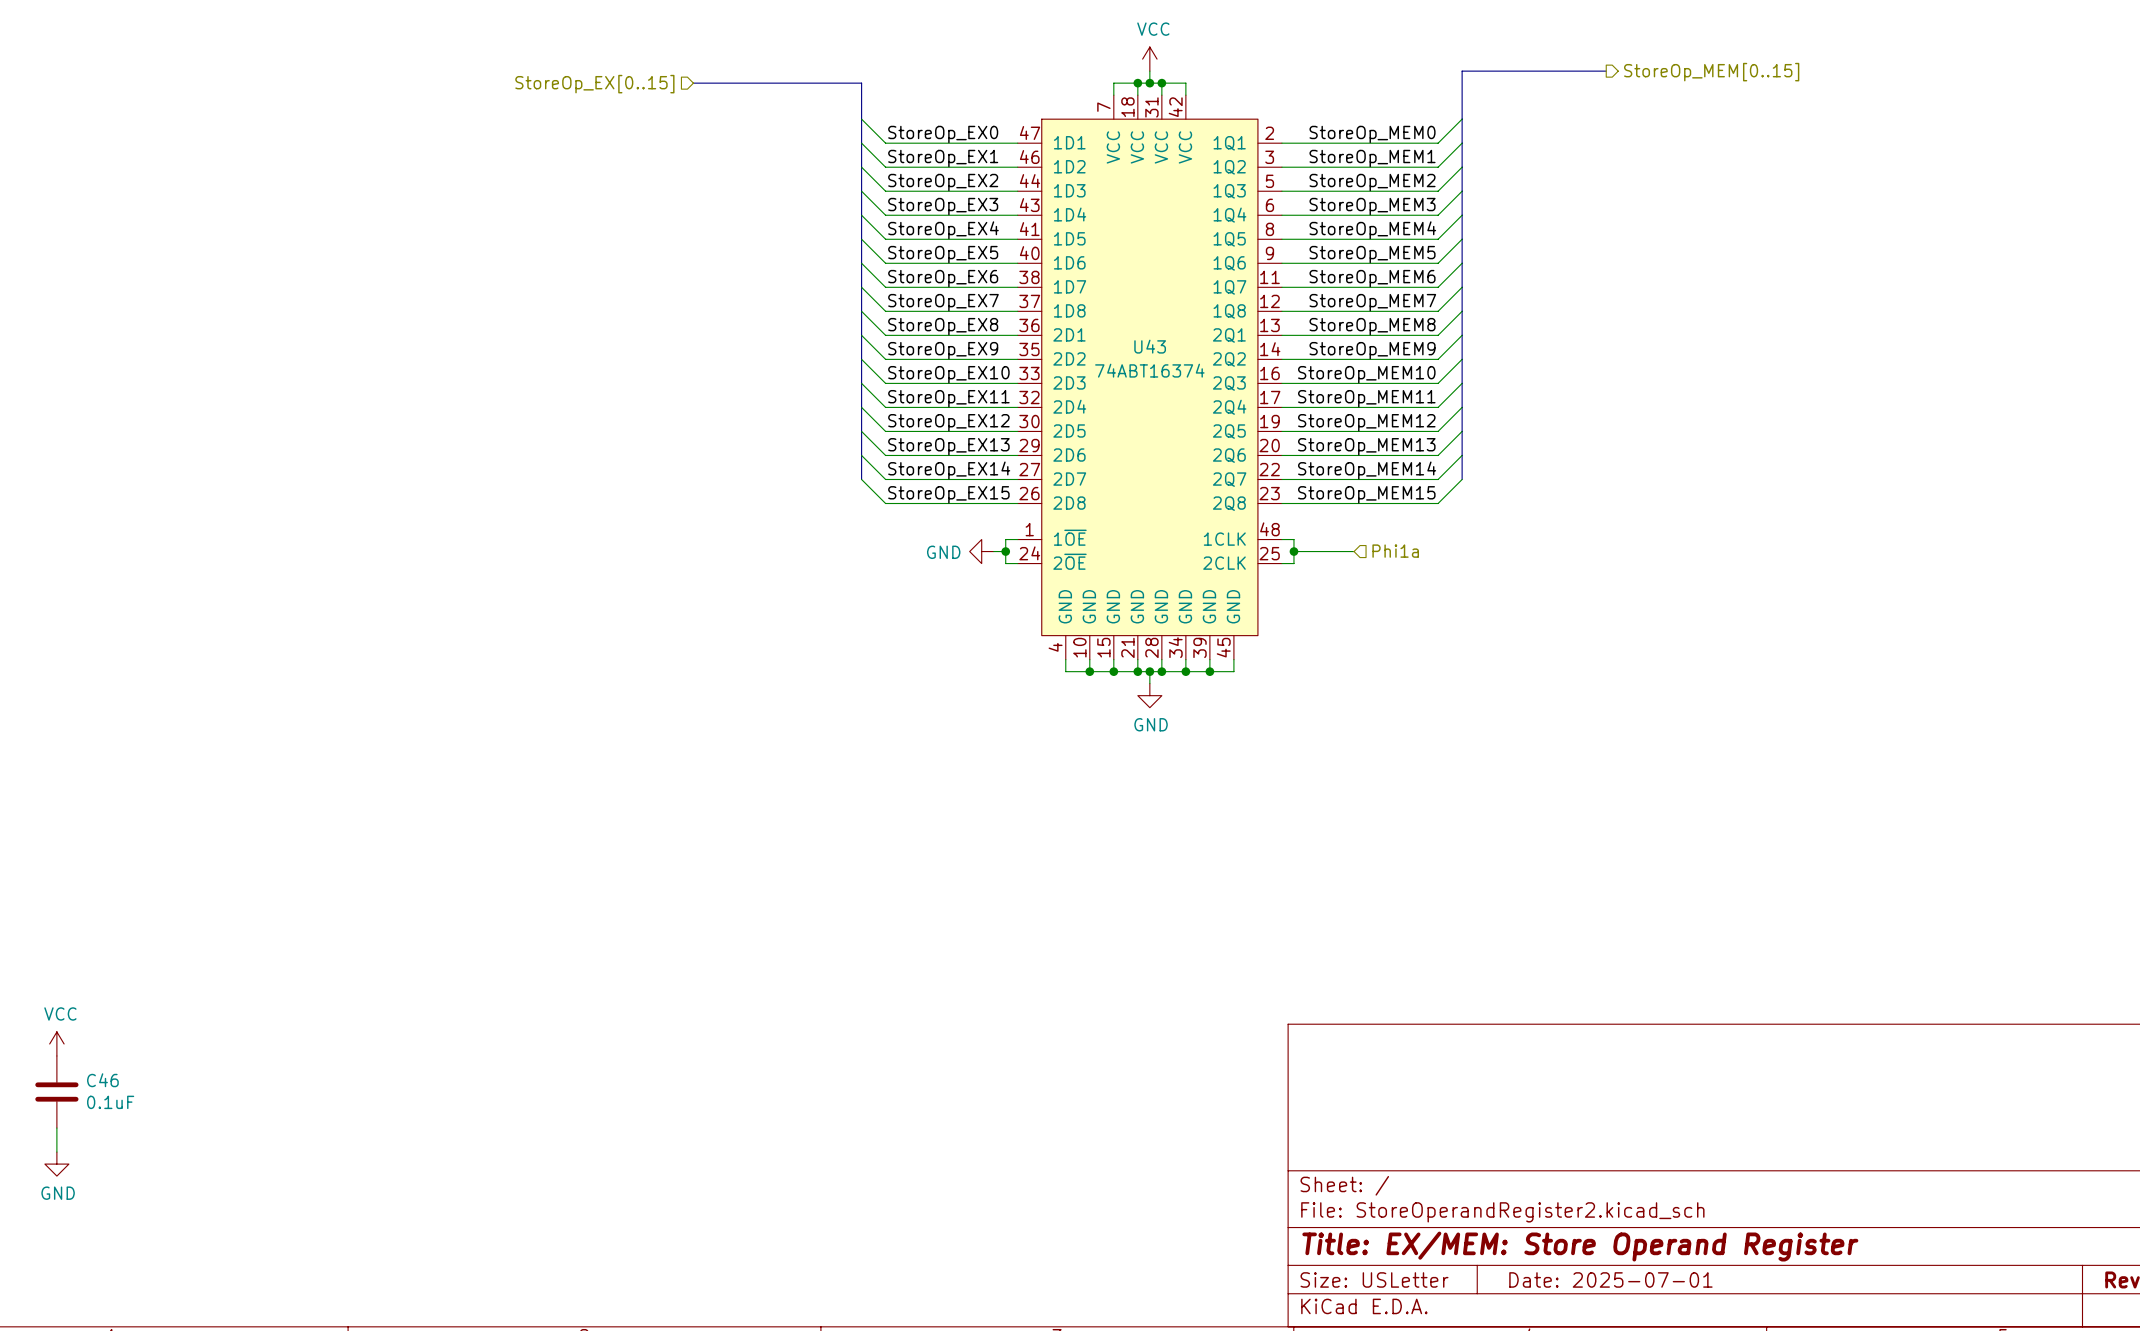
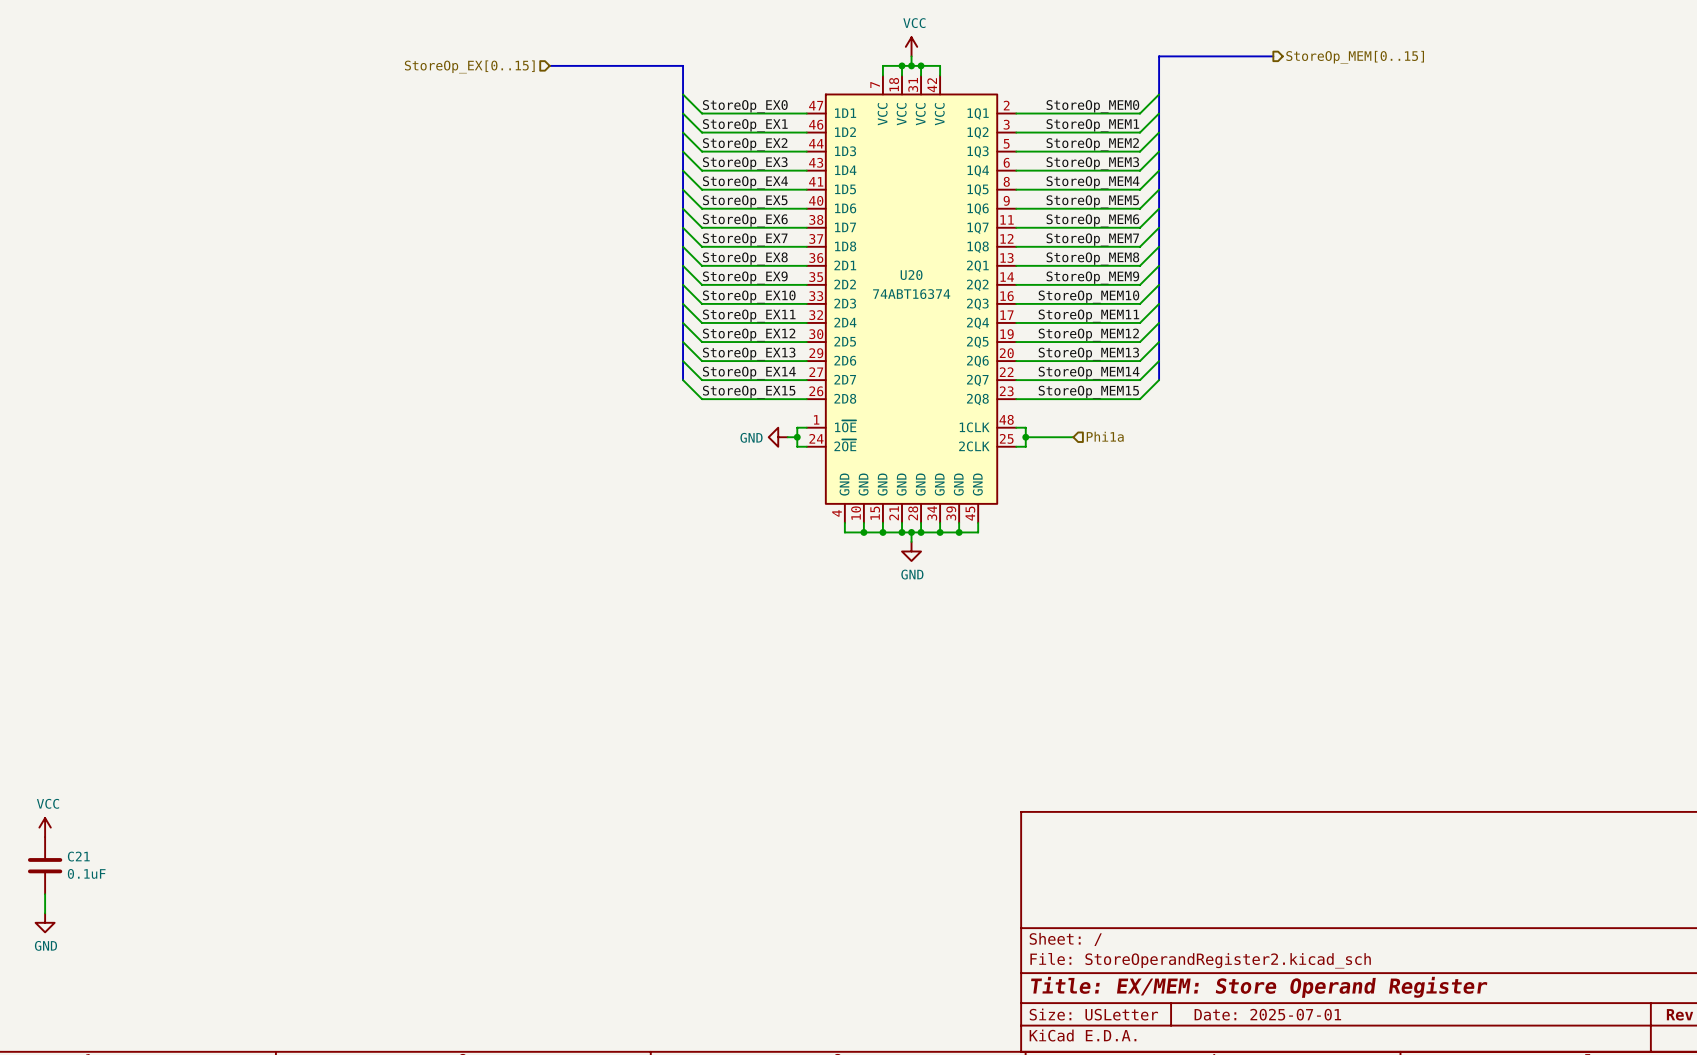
U43 name: U43 (1150, 346) -> U20 (911, 275)
C46 name: C46 (102, 1080) -> C21 (78, 856)

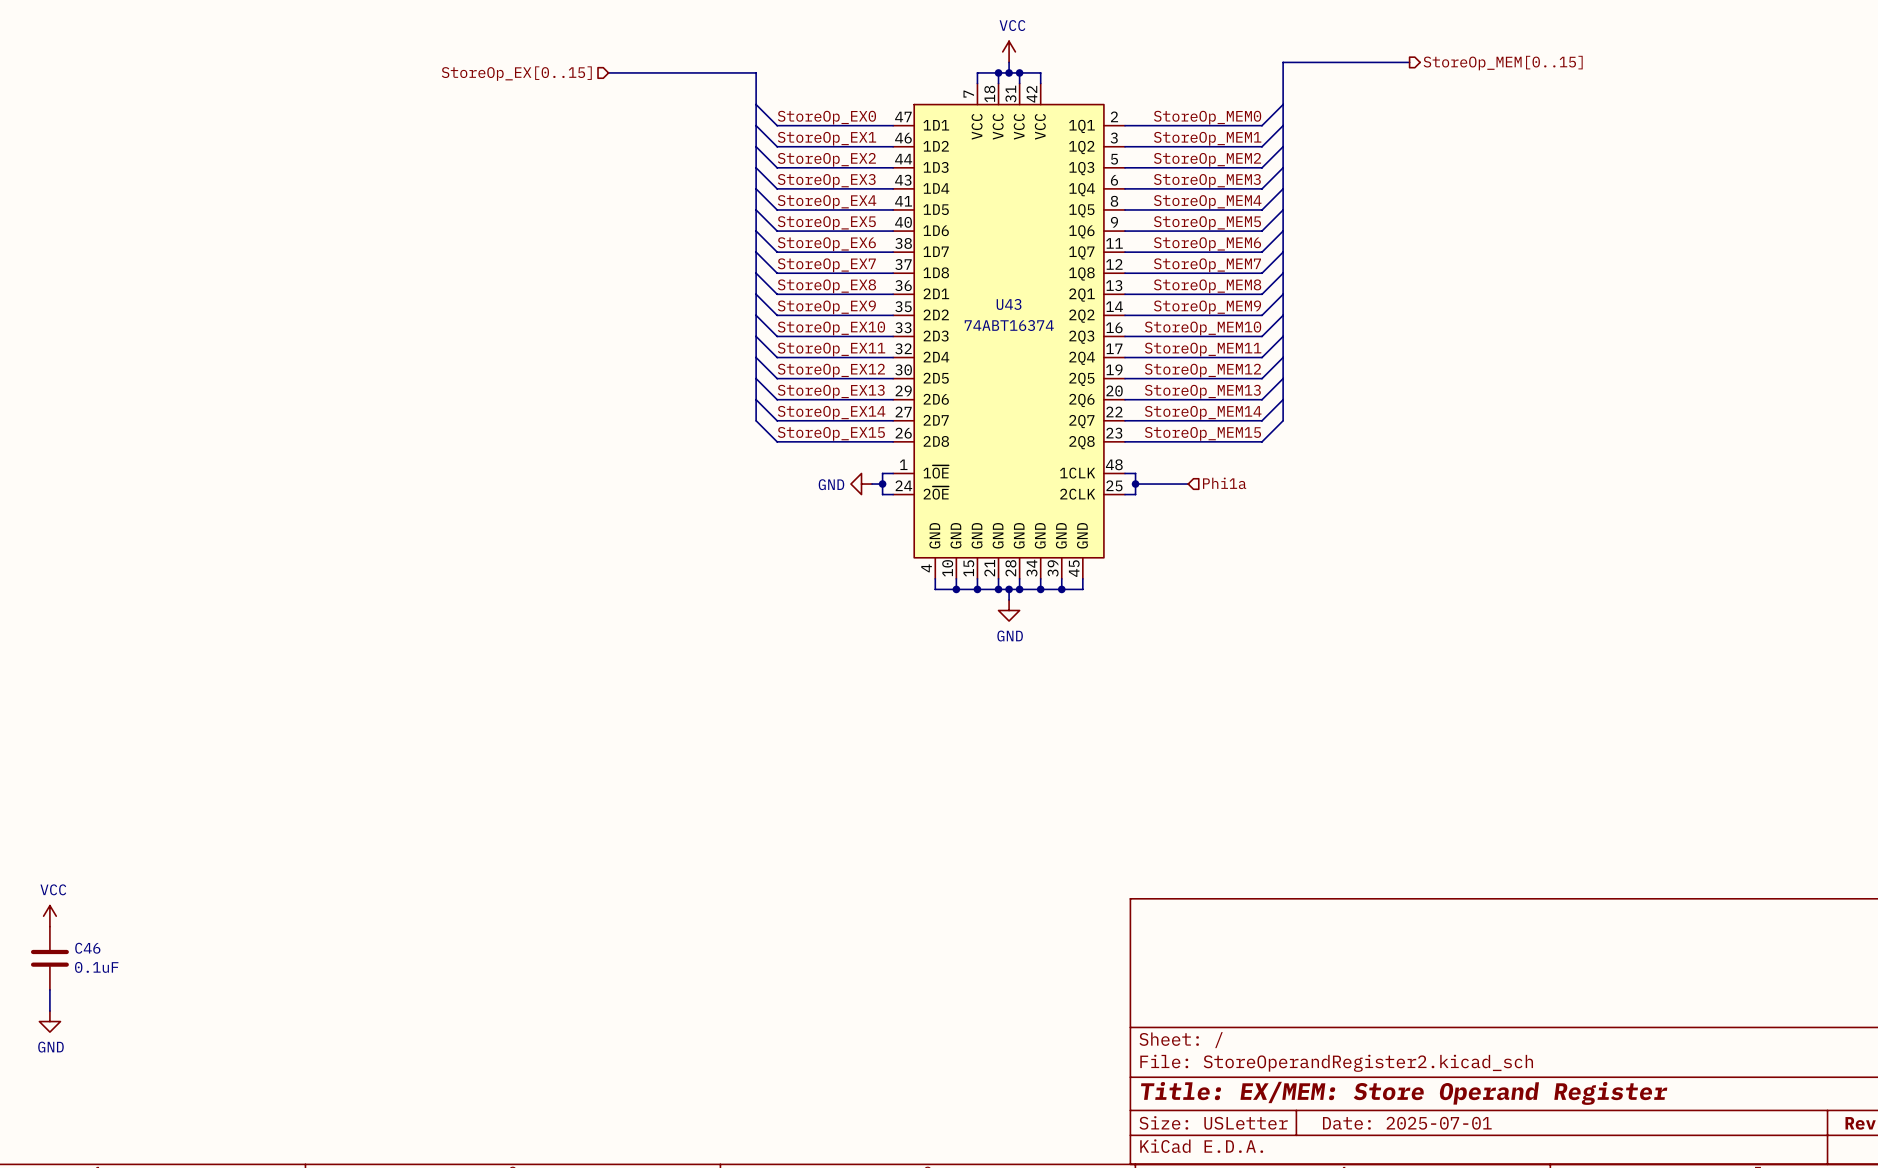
U20 name: U20 (911, 275) -> U43 (1009, 304)
C21 name: C21 (78, 856) -> C46 (87, 948)

